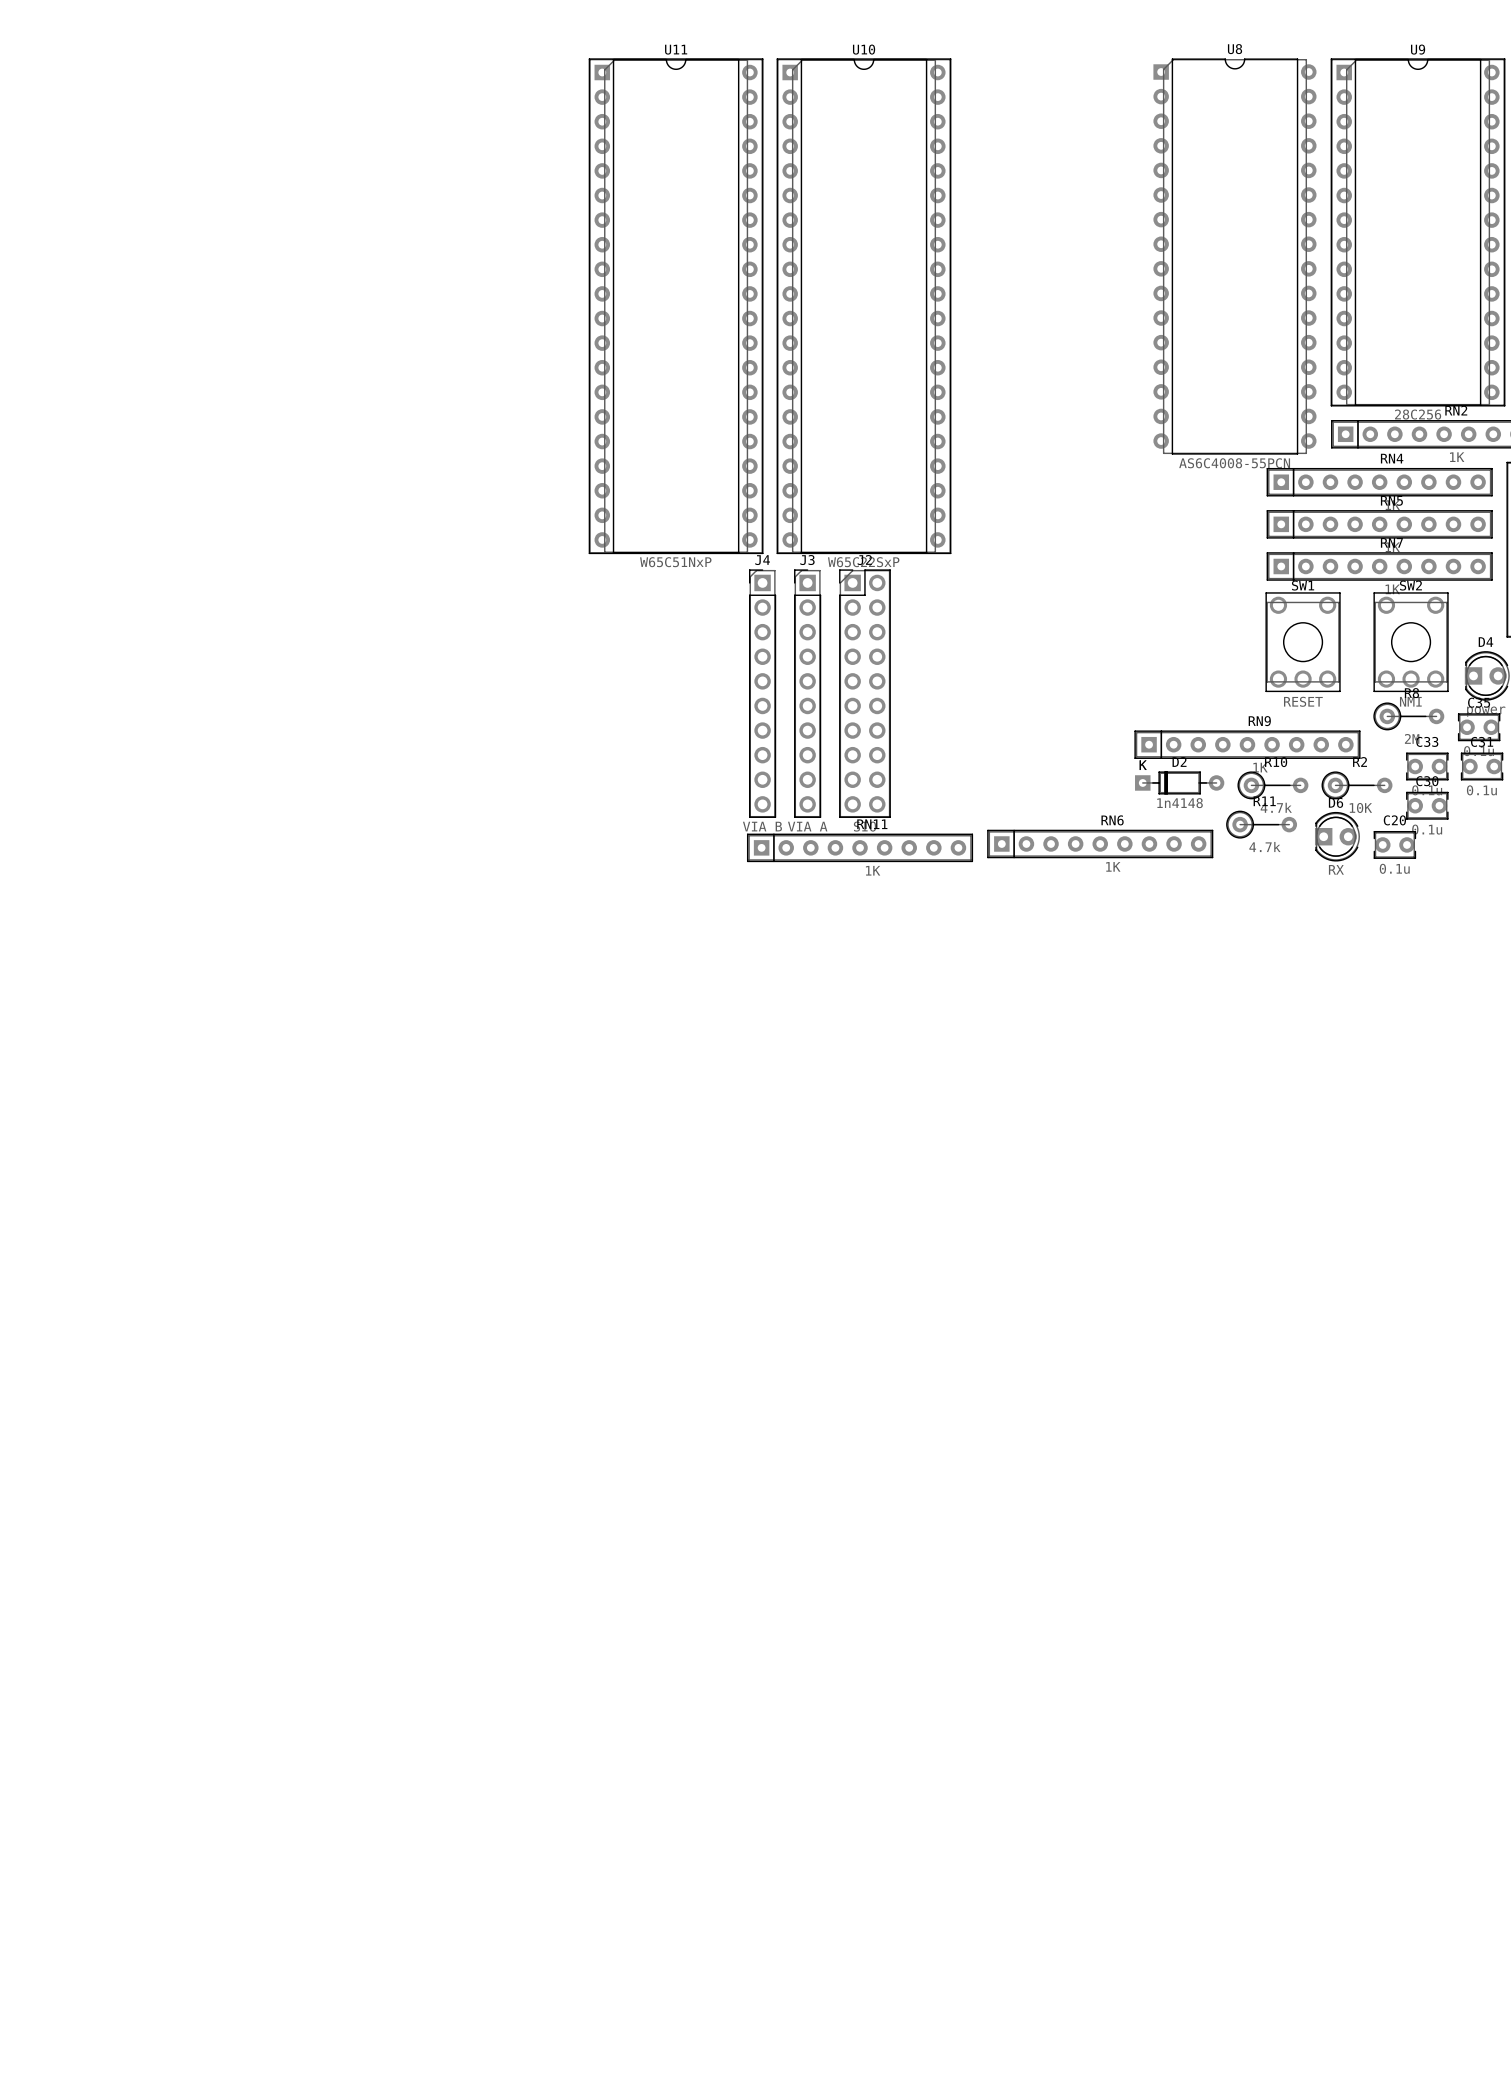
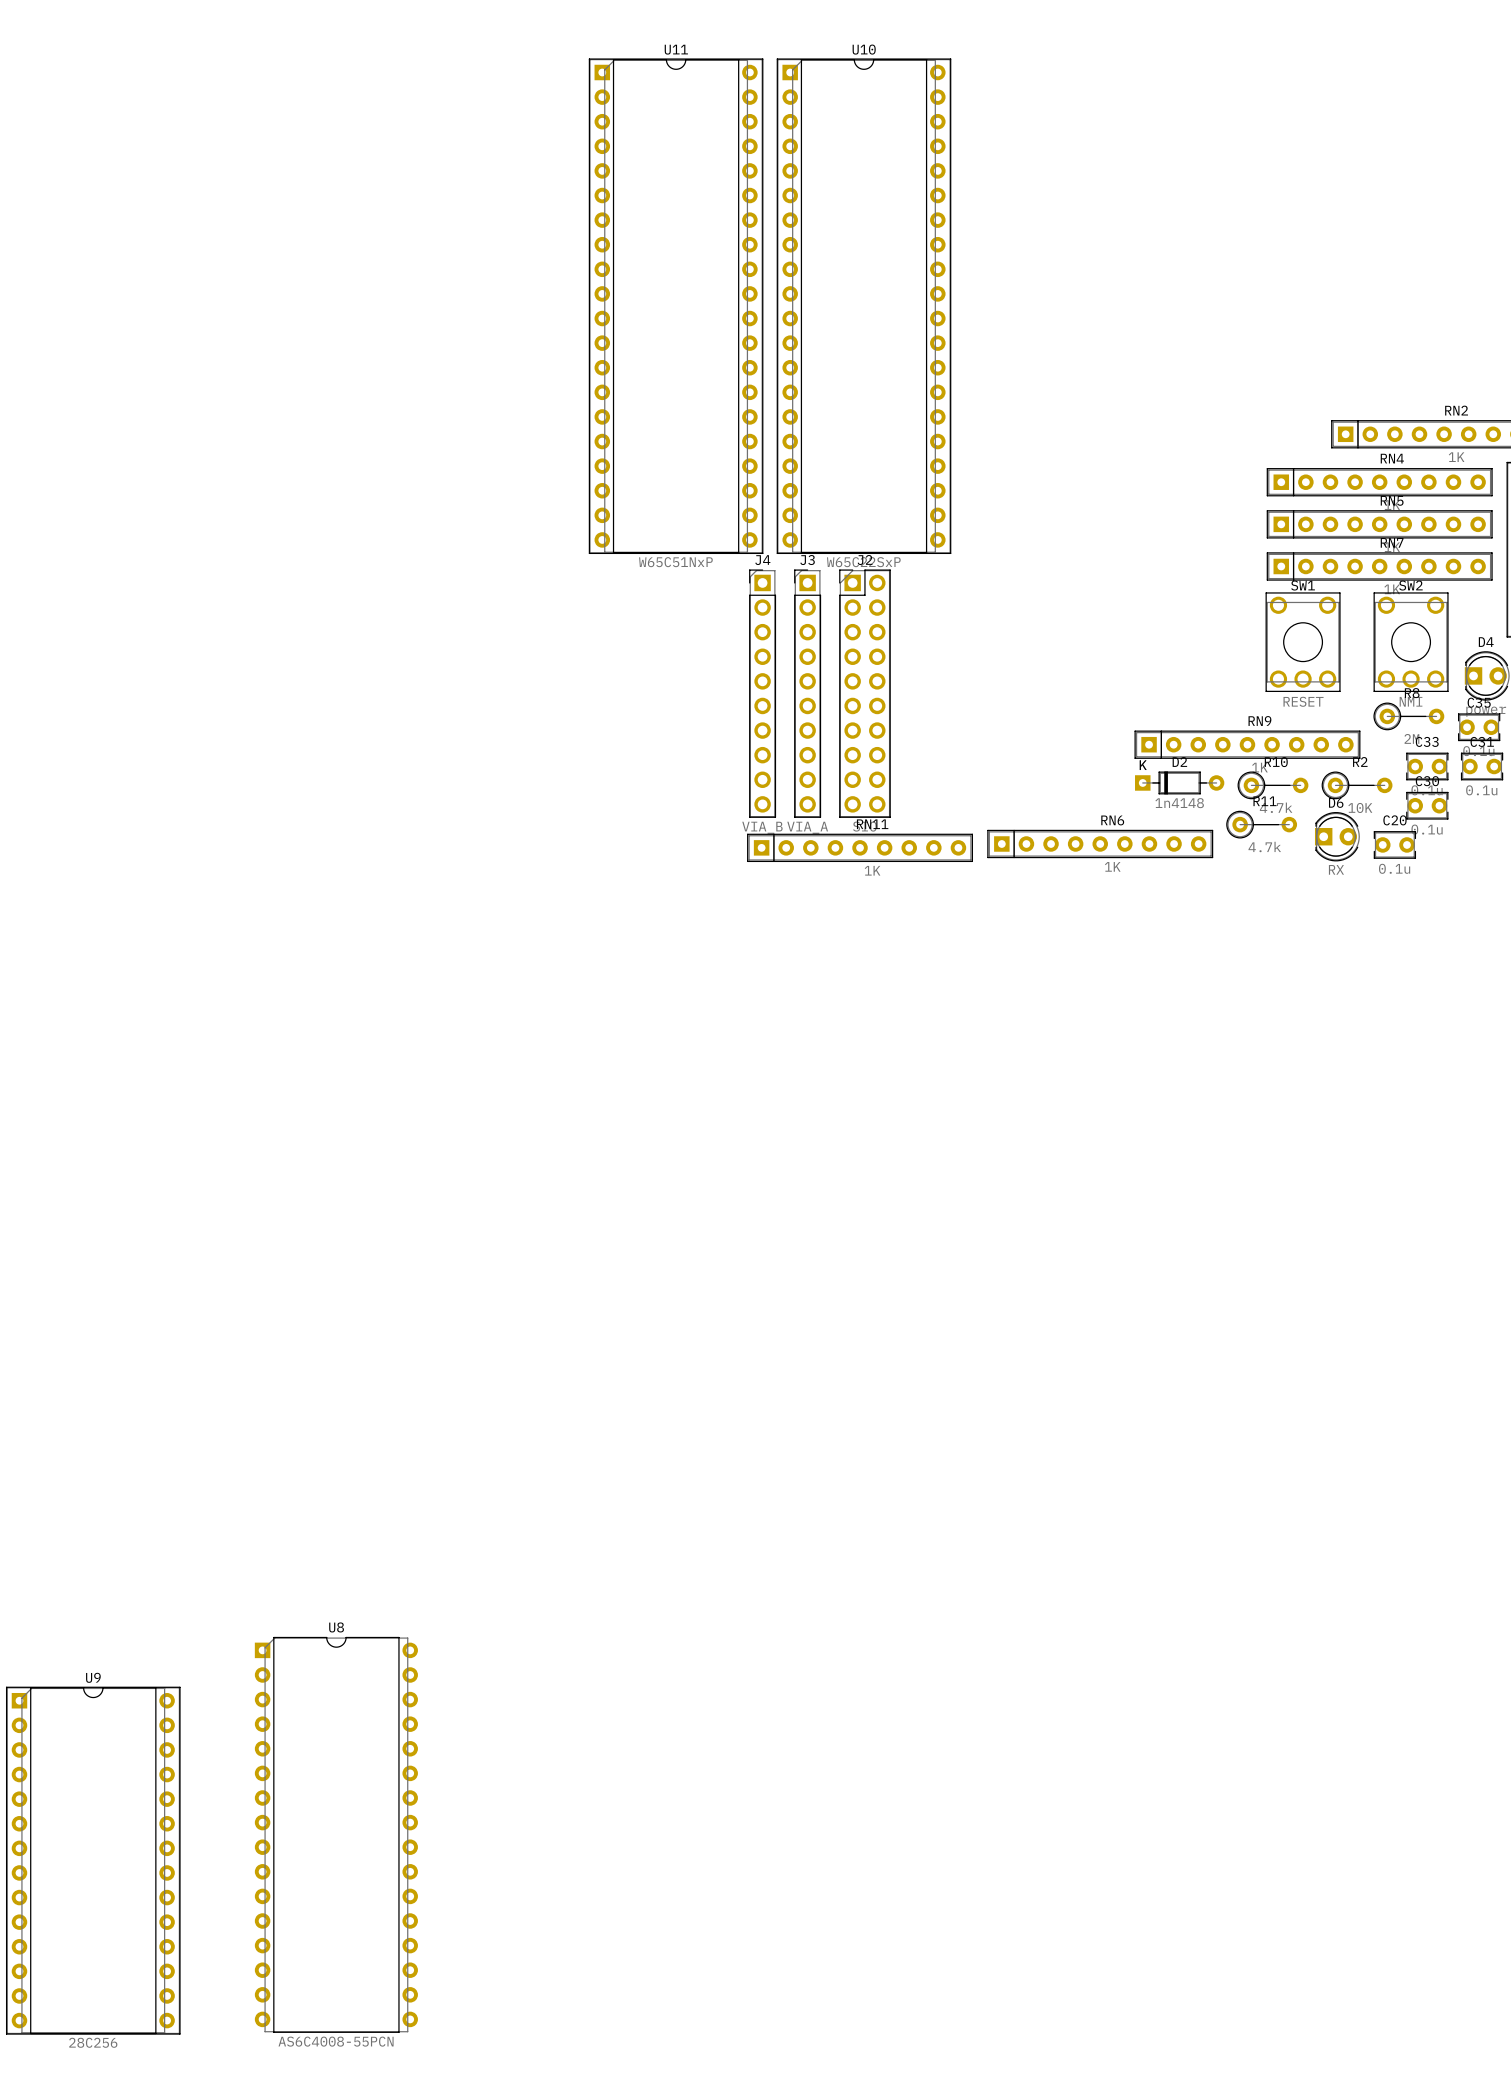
U9 position: (1418, 232) -> (93, 1860)
U8 position: (1234, 256) -> (336, 1834)

